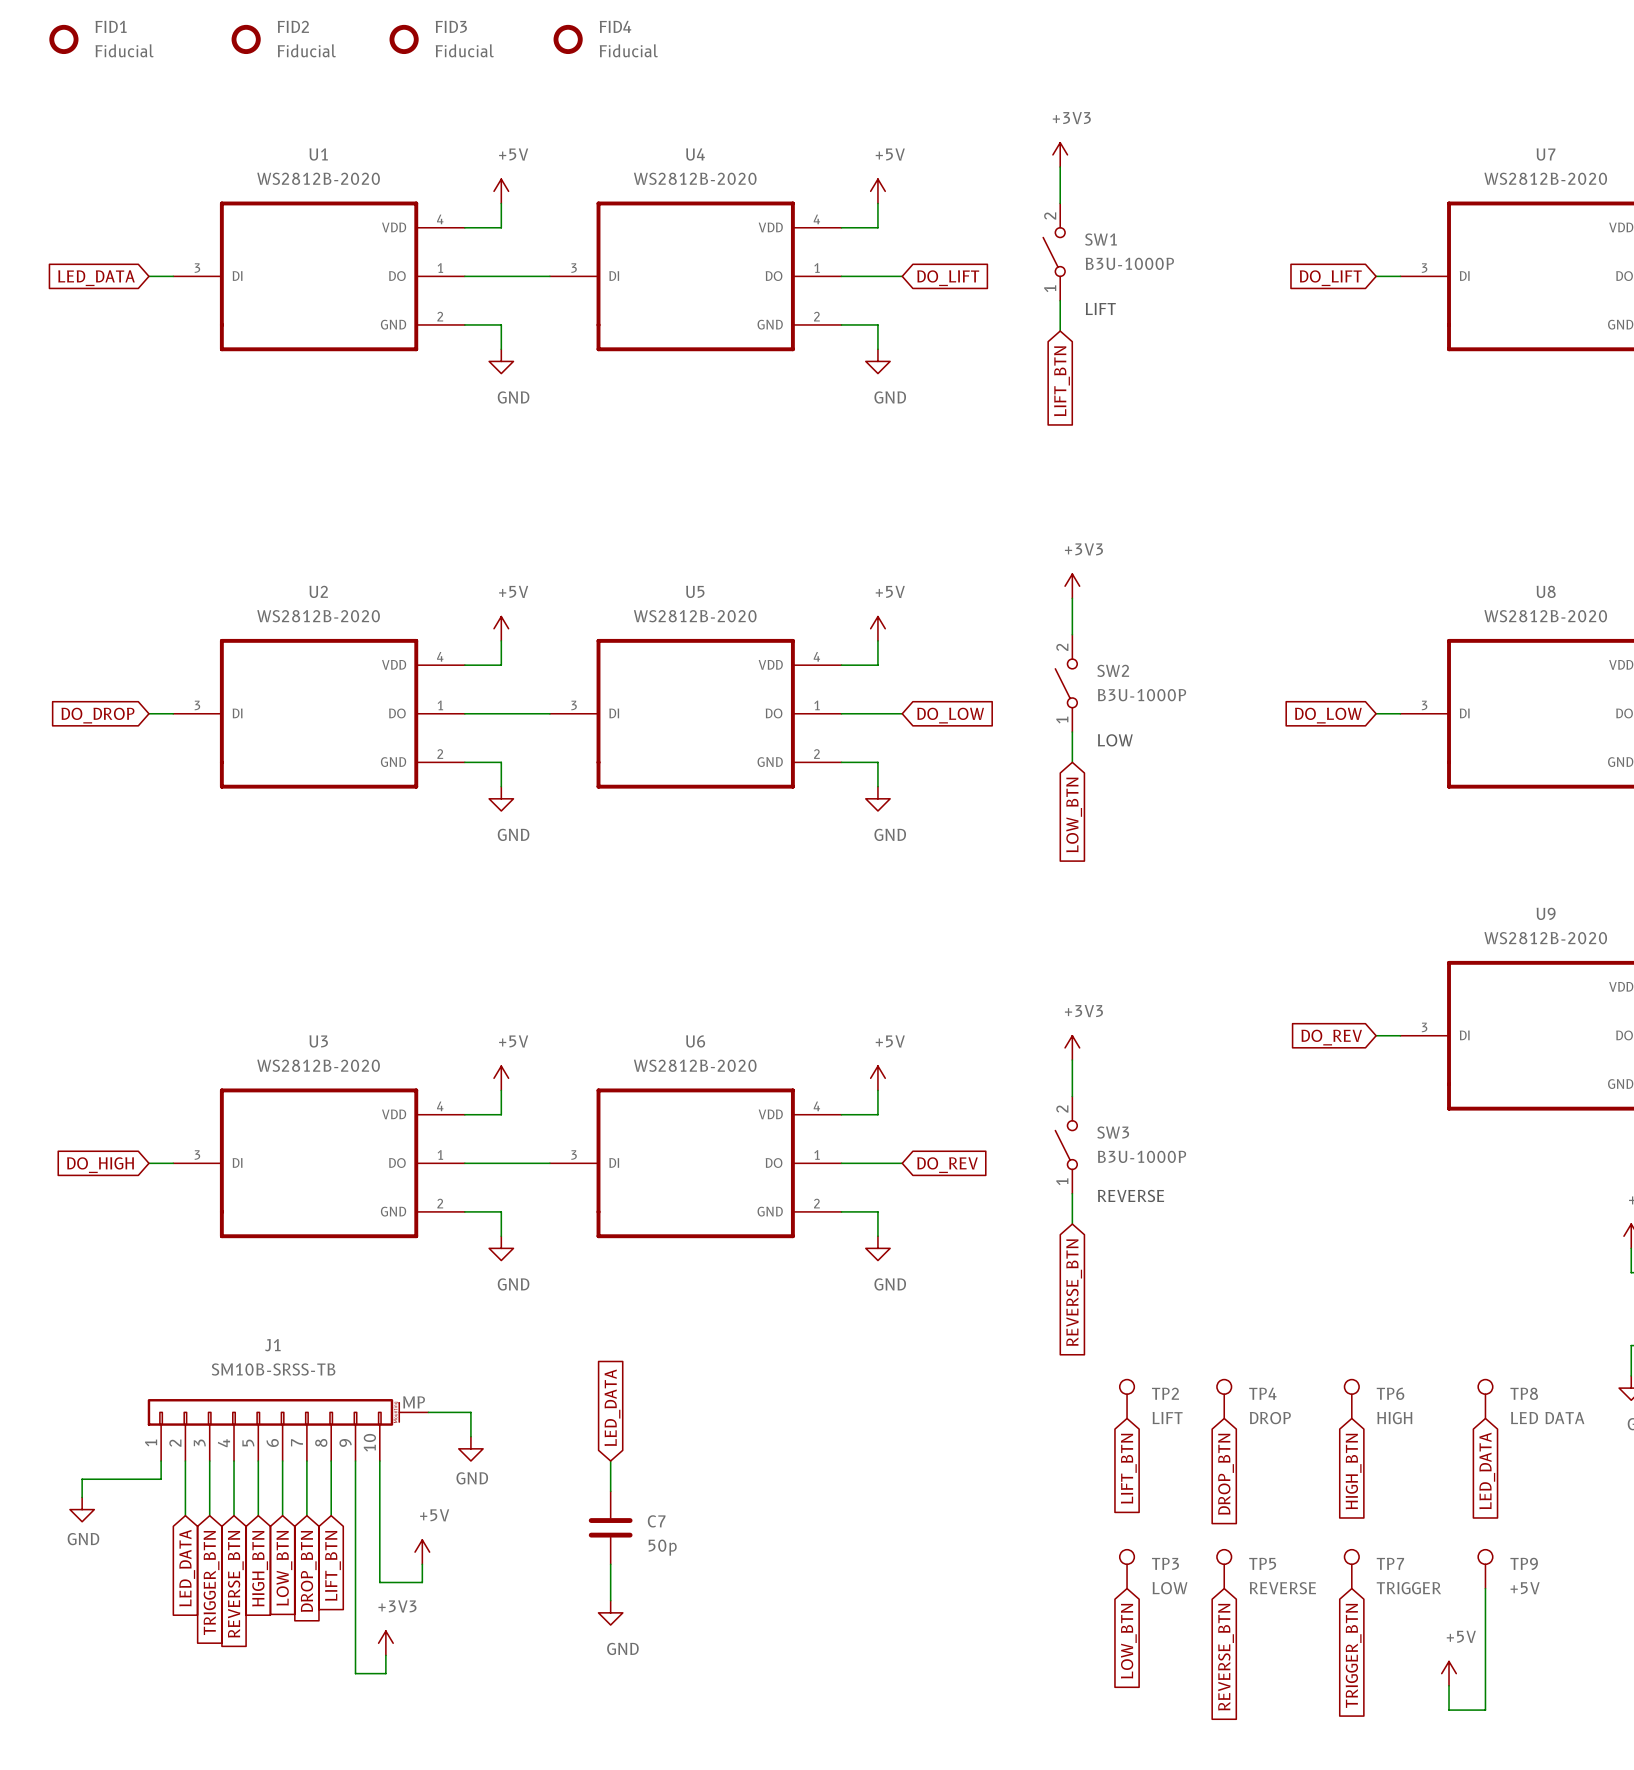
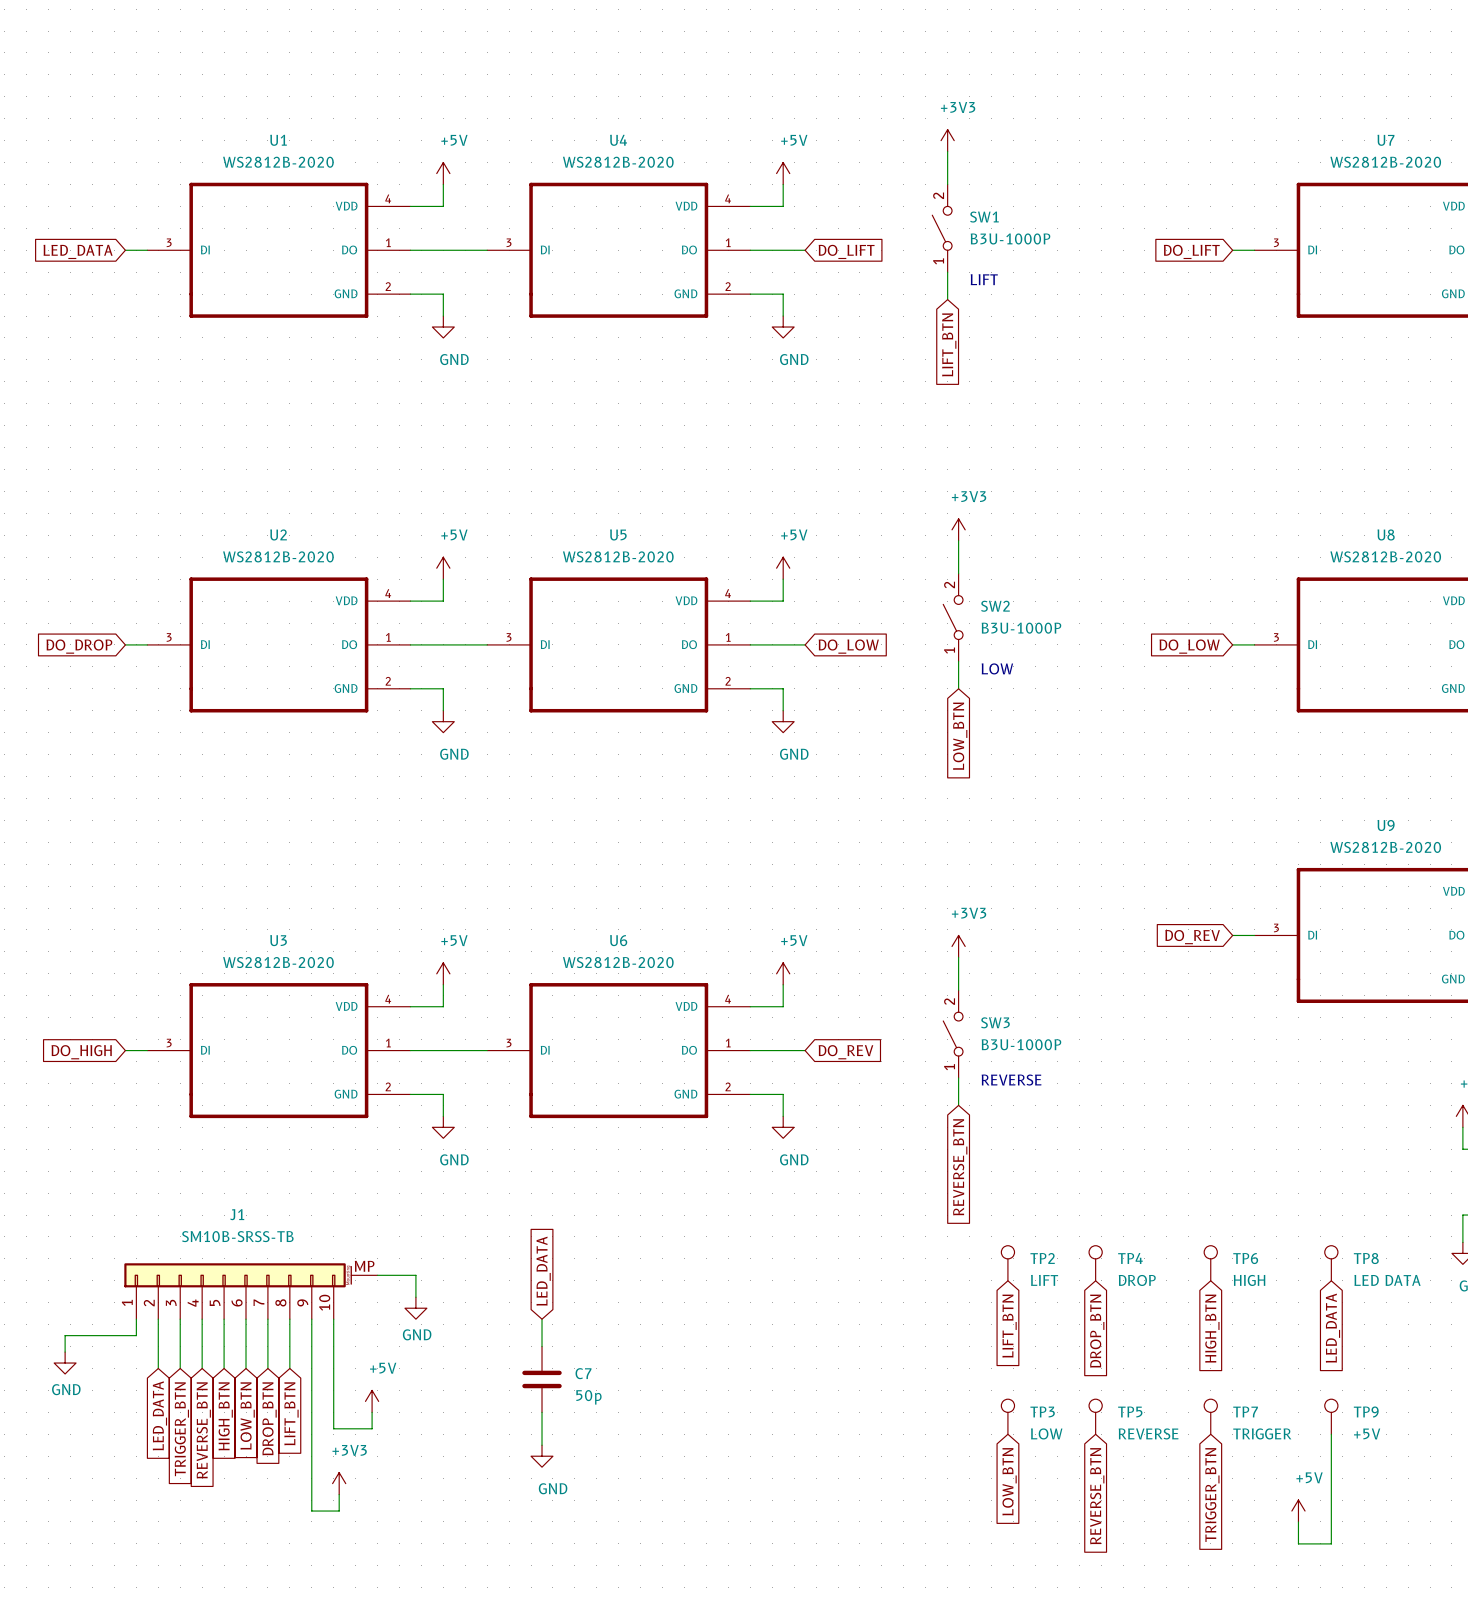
FID1: Fiducial (63, 39) -> none
FID2: Fiducial (246, 39) -> none
FID3: Fiducial (404, 39) -> none
FID4: Fiducial (568, 39) -> none

